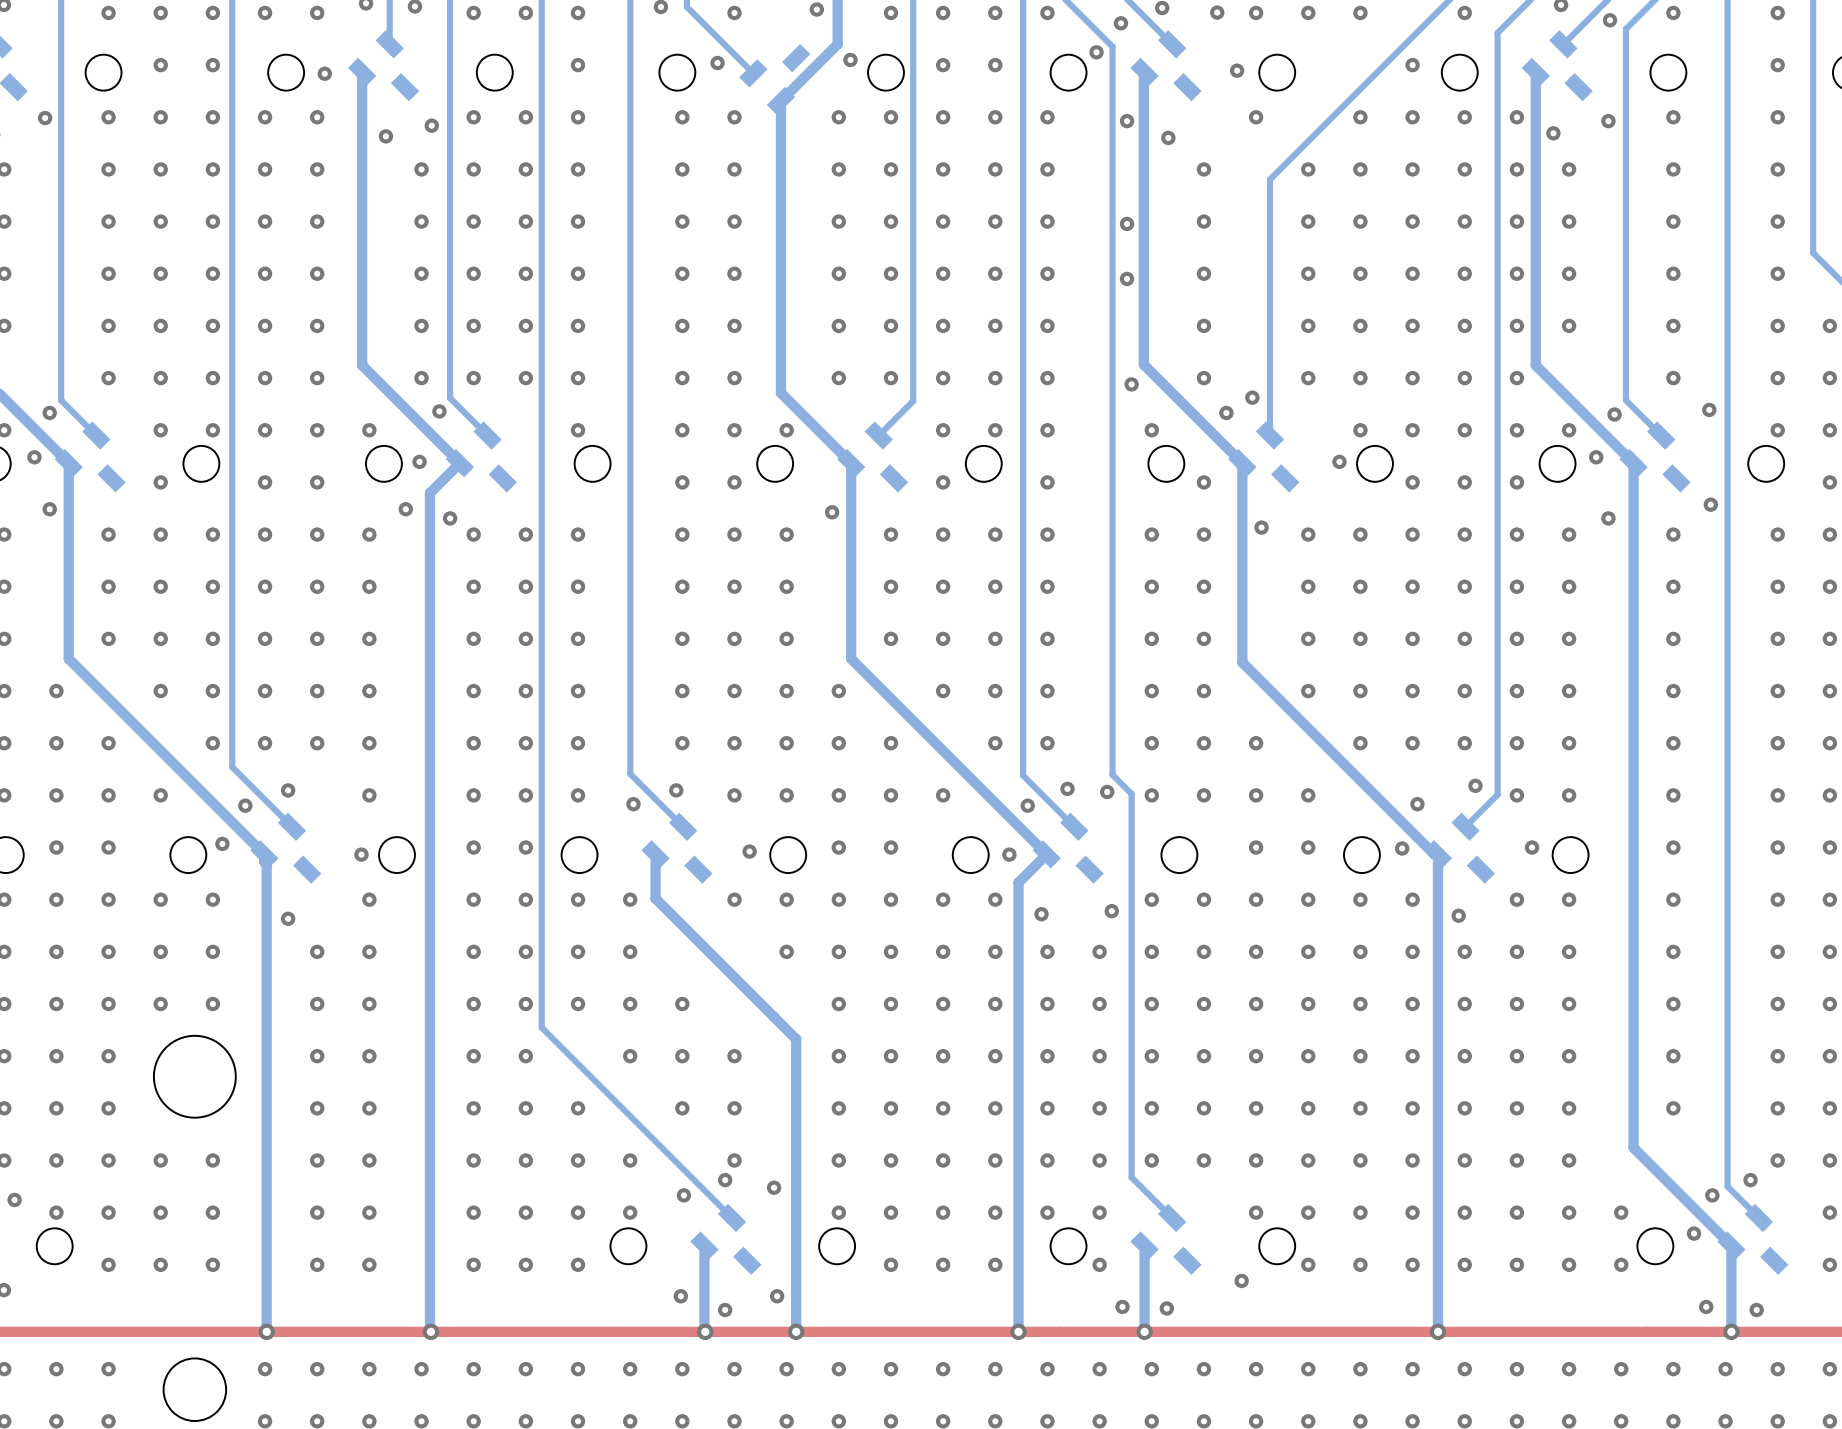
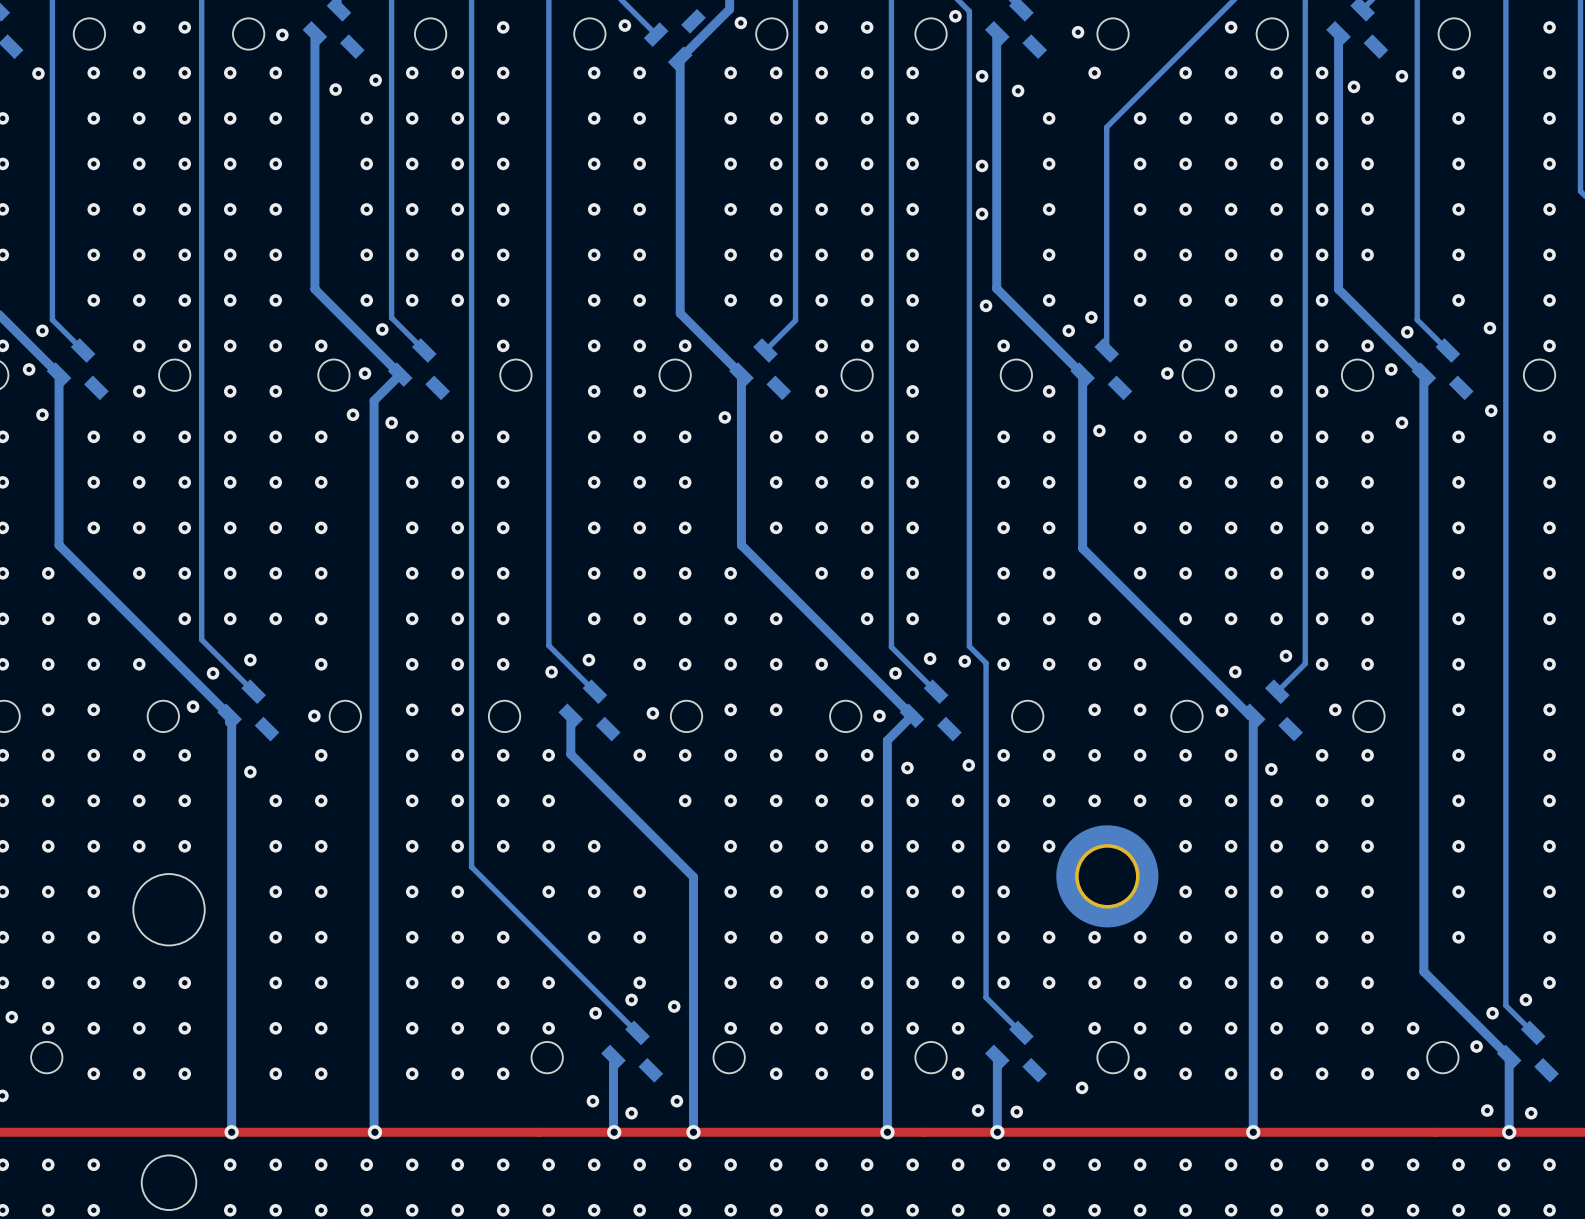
via: (1256, 1004) -> none
via: (1308, 1004) -> none
part: none -> (1107, 876)
via: (1203, 1056) -> none
via: (1256, 1056) -> none
via: (1308, 1056) -> none

